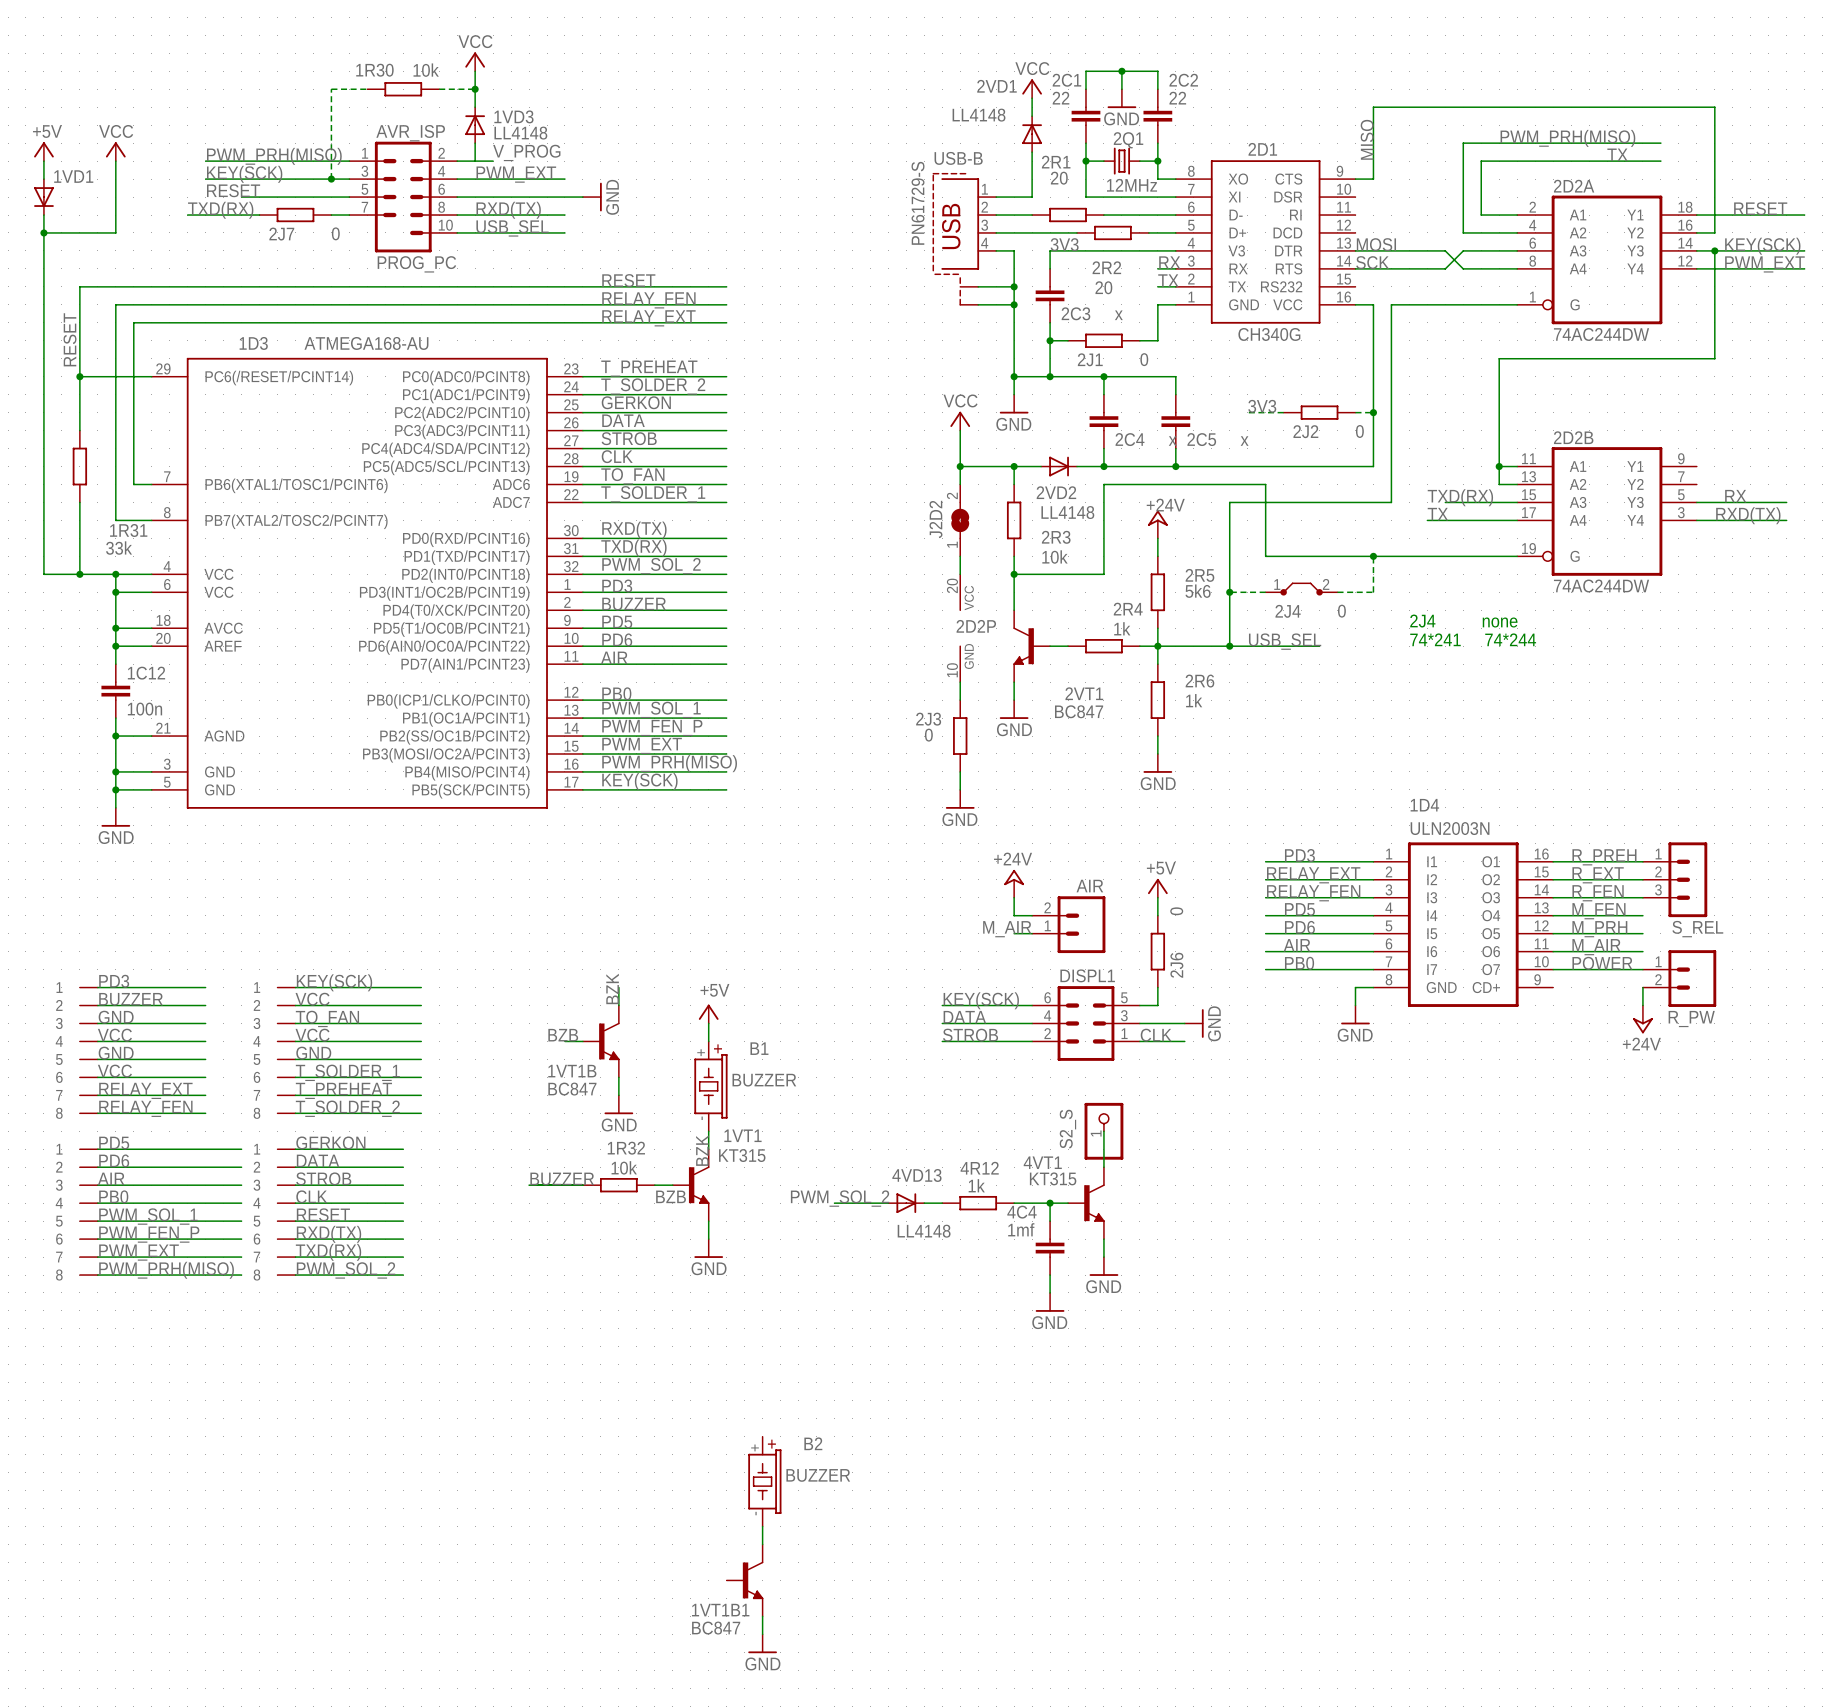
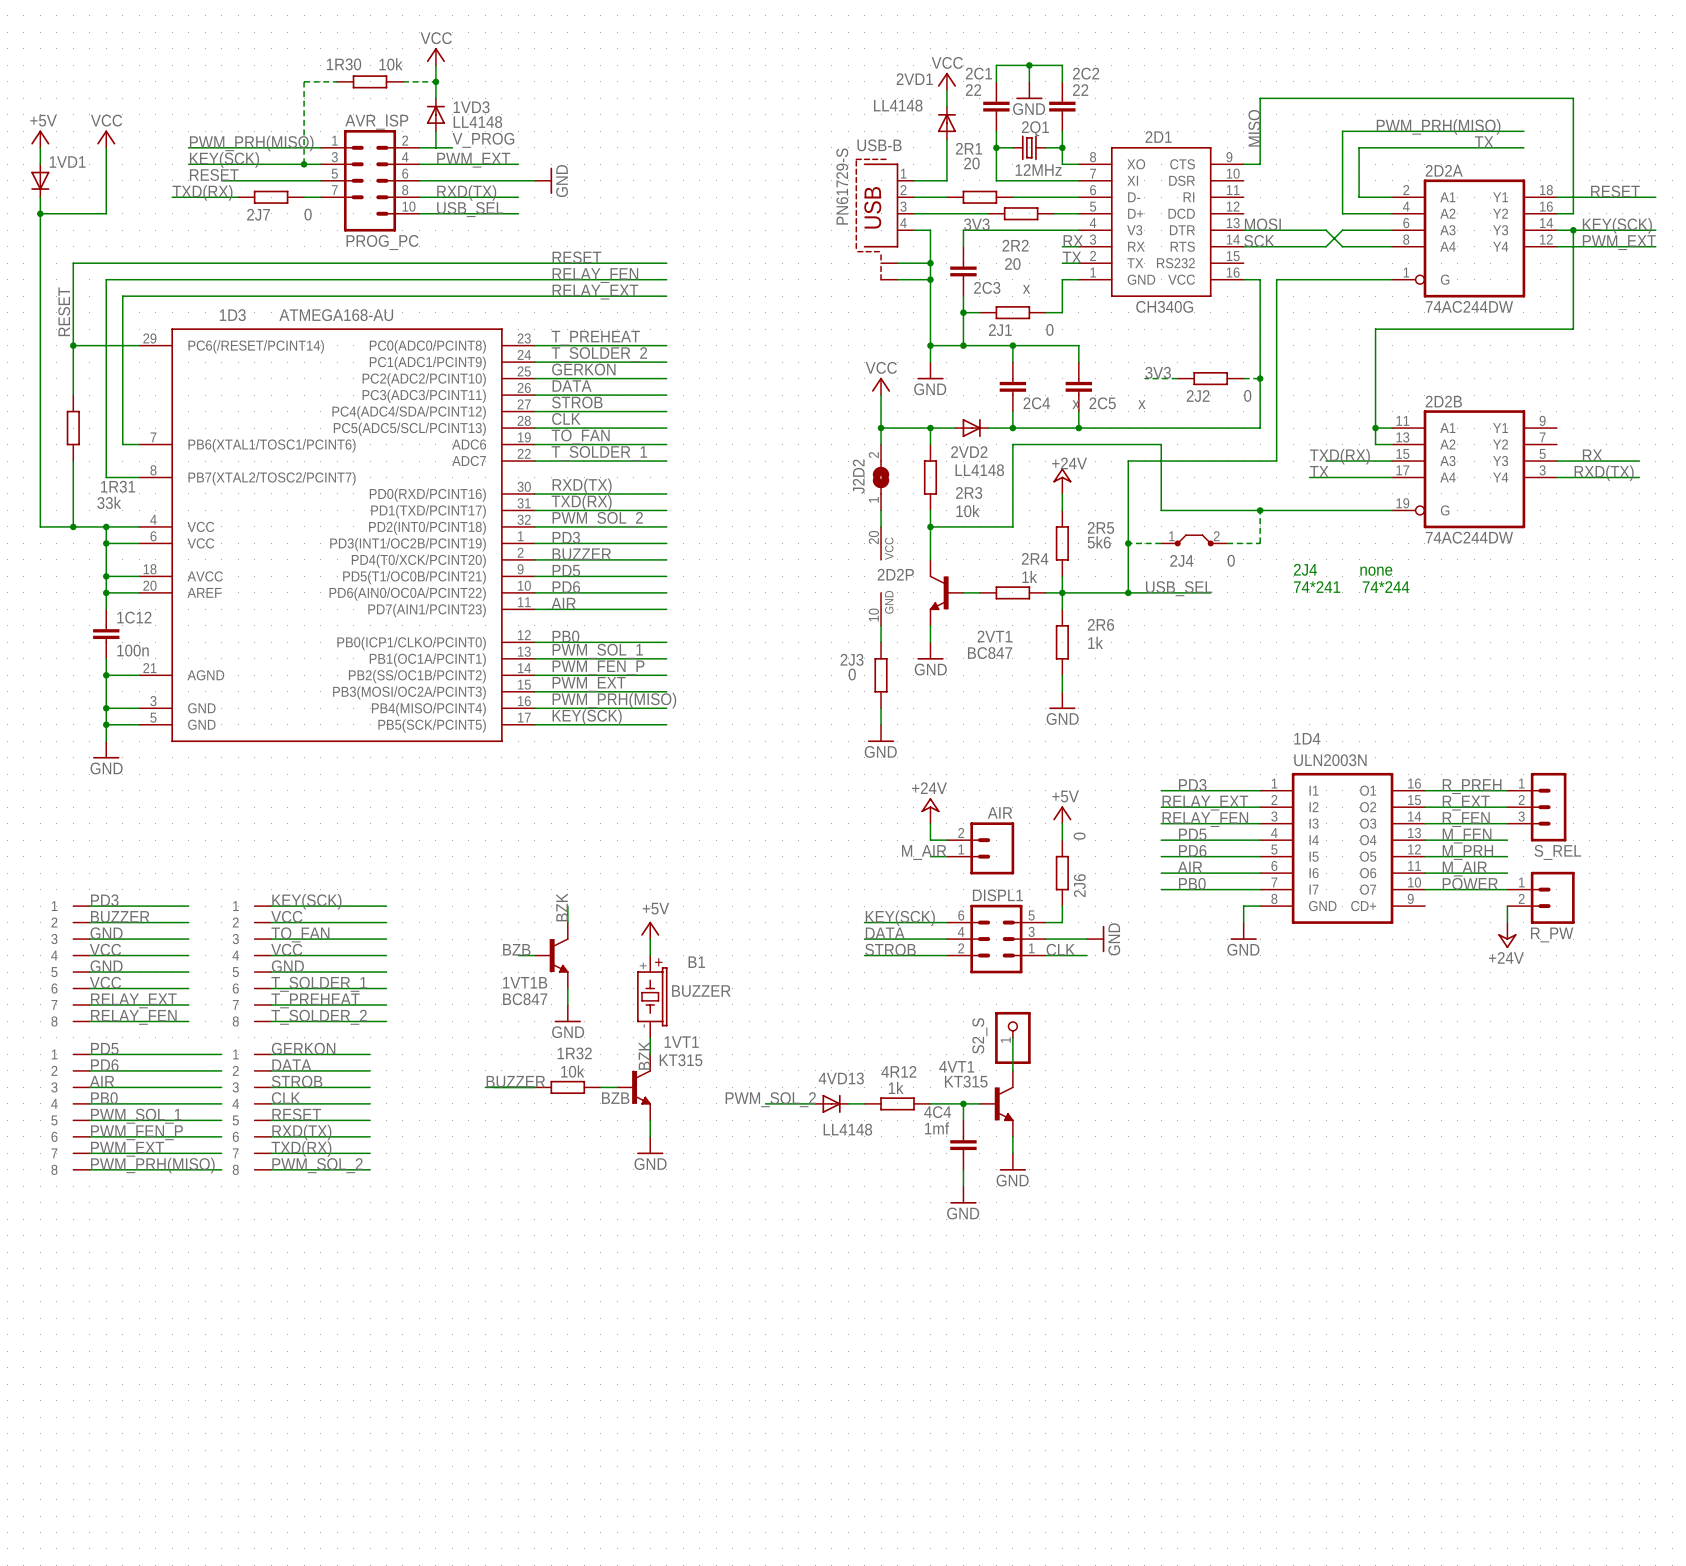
B2: BUZZER (764, 1481) -> none
wire: (762, 1526) (762, 1544) -> none
1VT1B1: BC847 (744, 1580) -> none
wire: (762, 1616) (762, 1634) -> none
power symbol: GND (762, 1643) -> none

